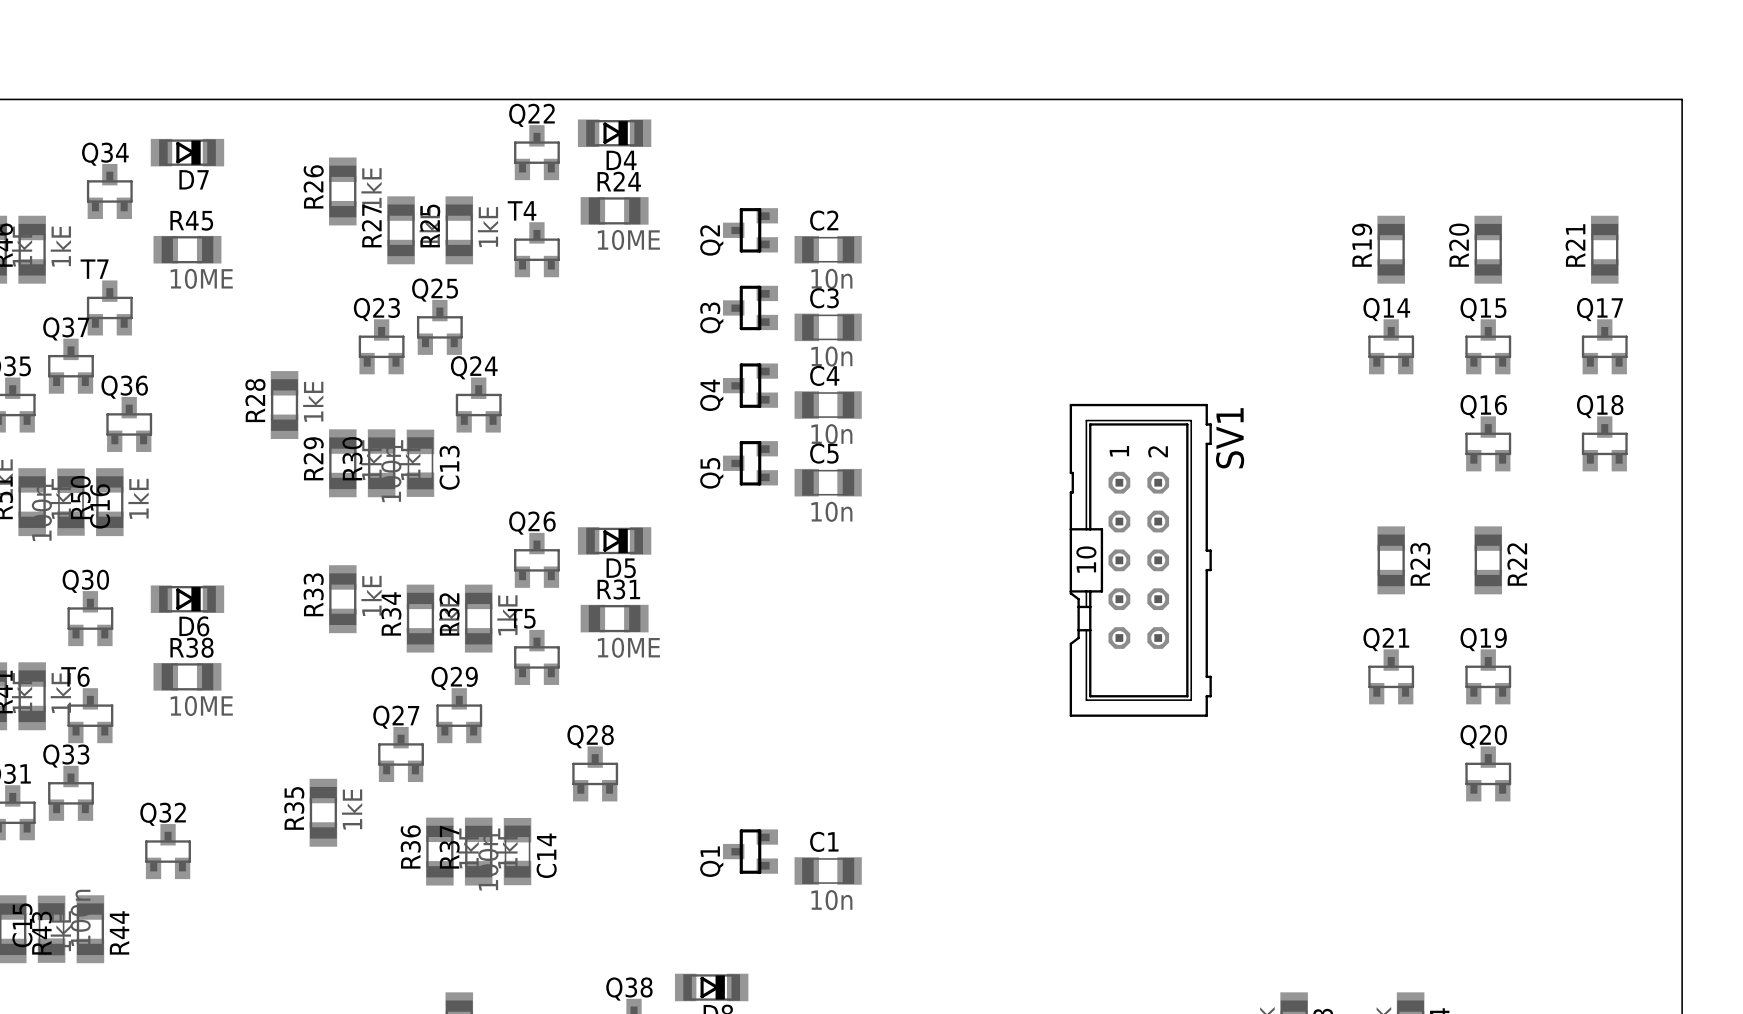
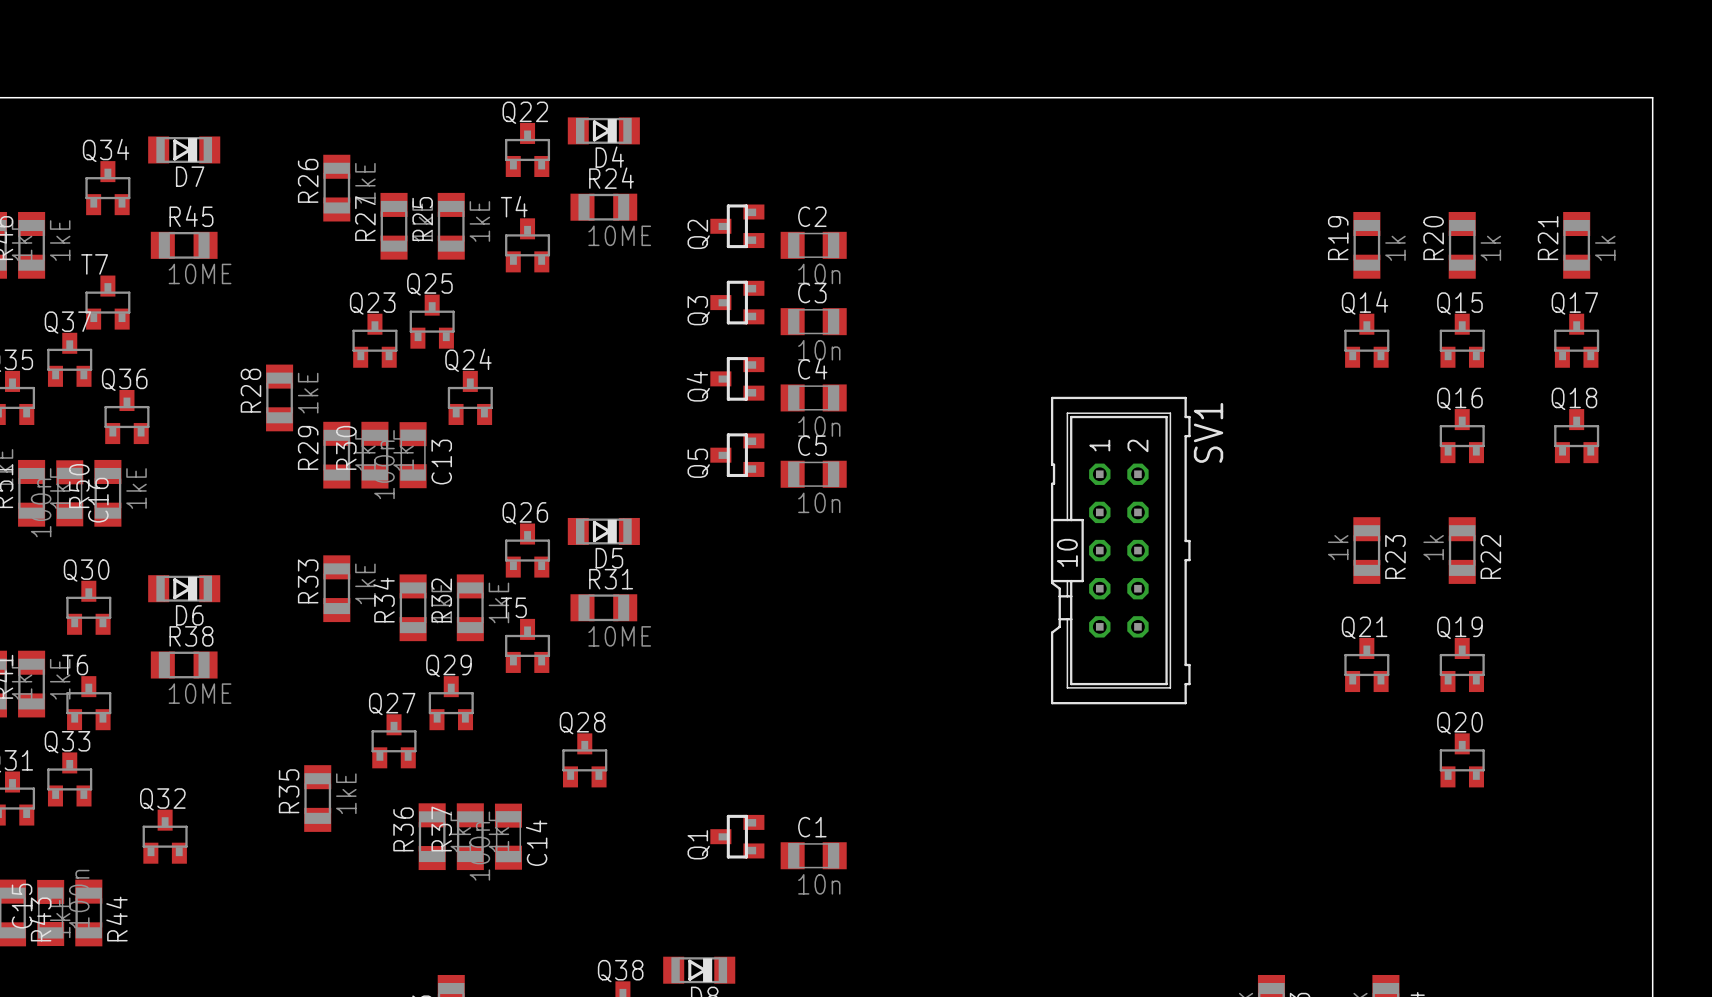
R19 value: none -> 1k (1395, 248)
R20 value: none -> 1k (1490, 248)
R21 value: none -> 1k (1605, 248)
R23 value: none -> 1k (1338, 547)
R22 value: none -> 1k (1433, 547)

